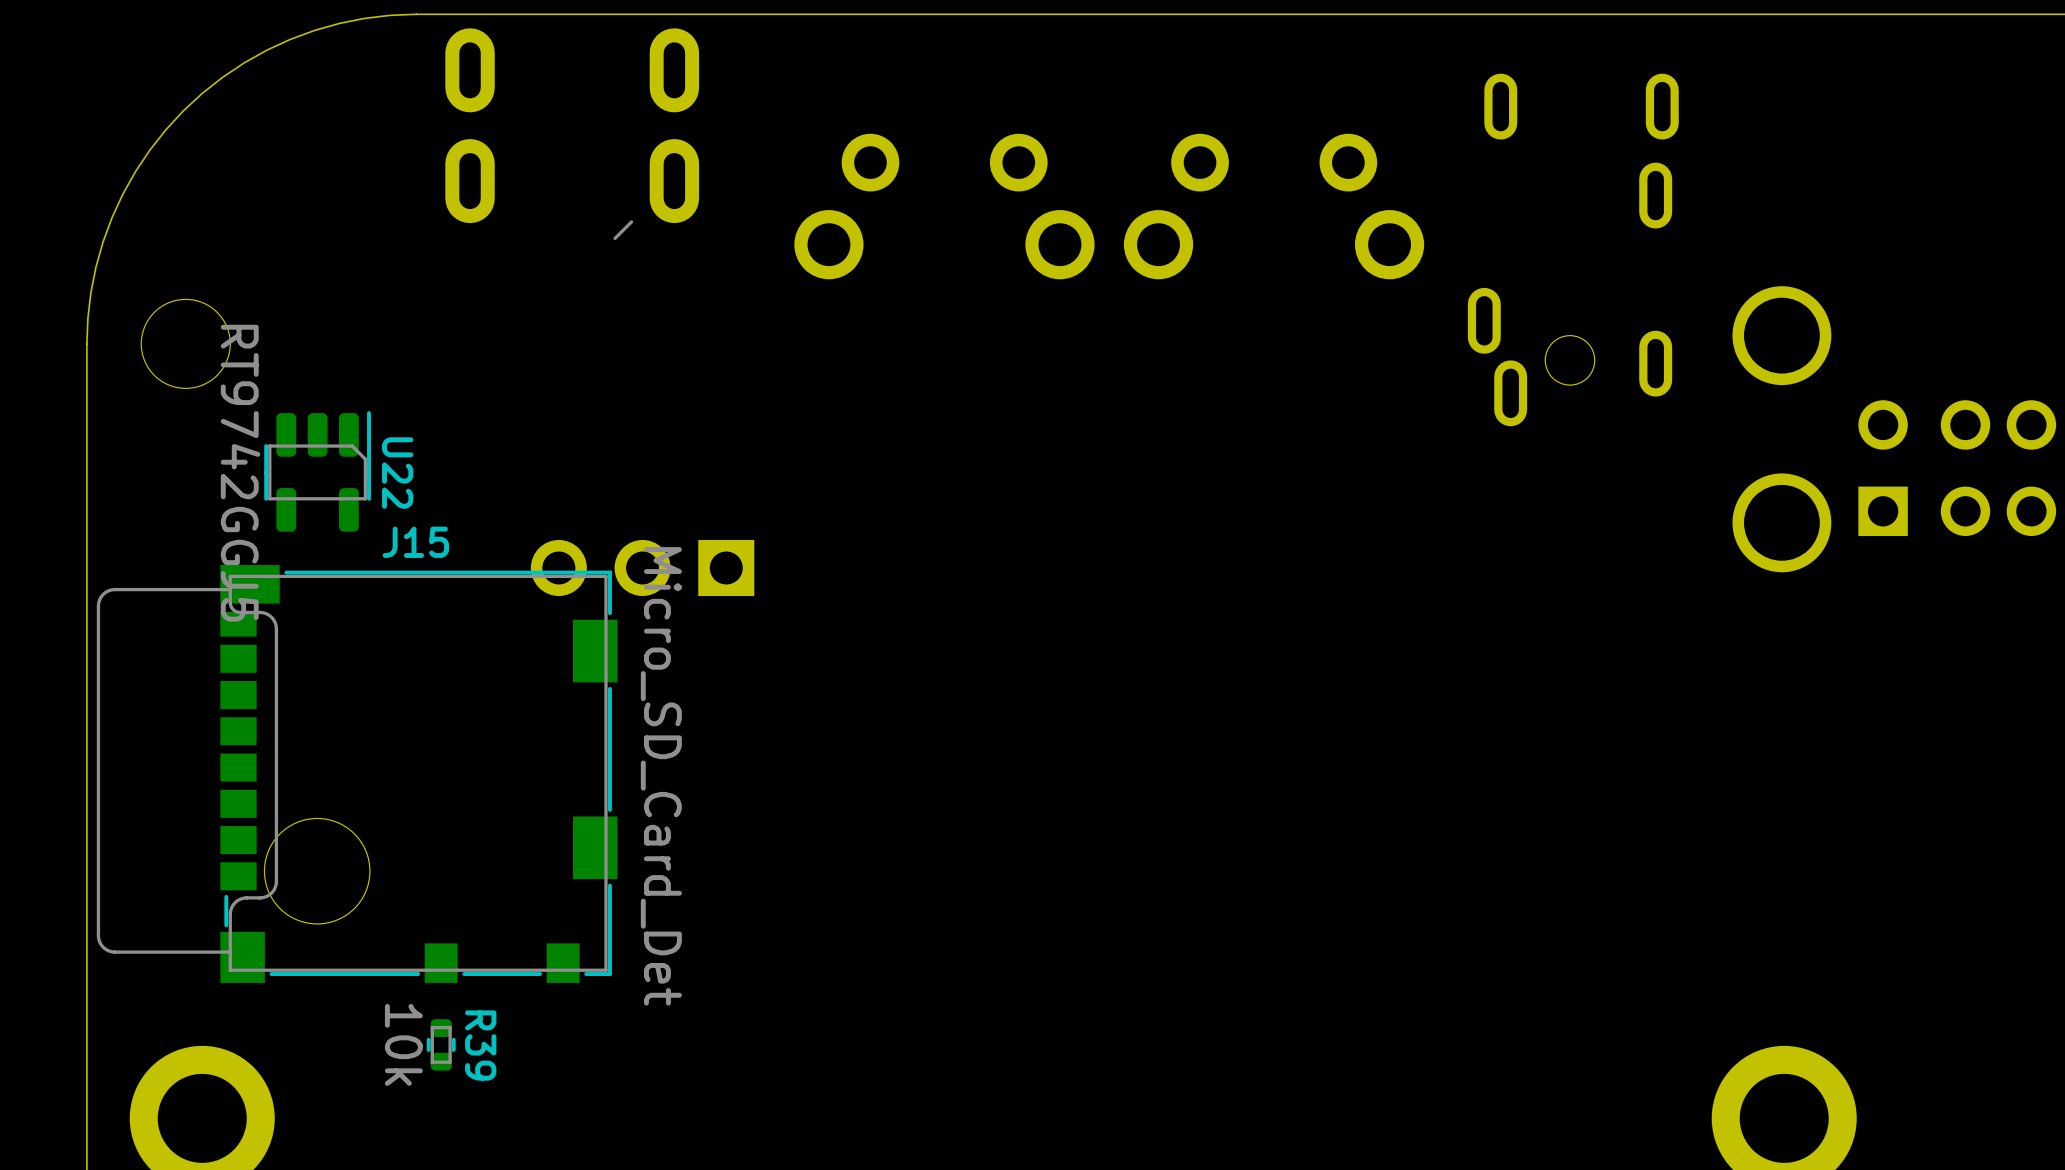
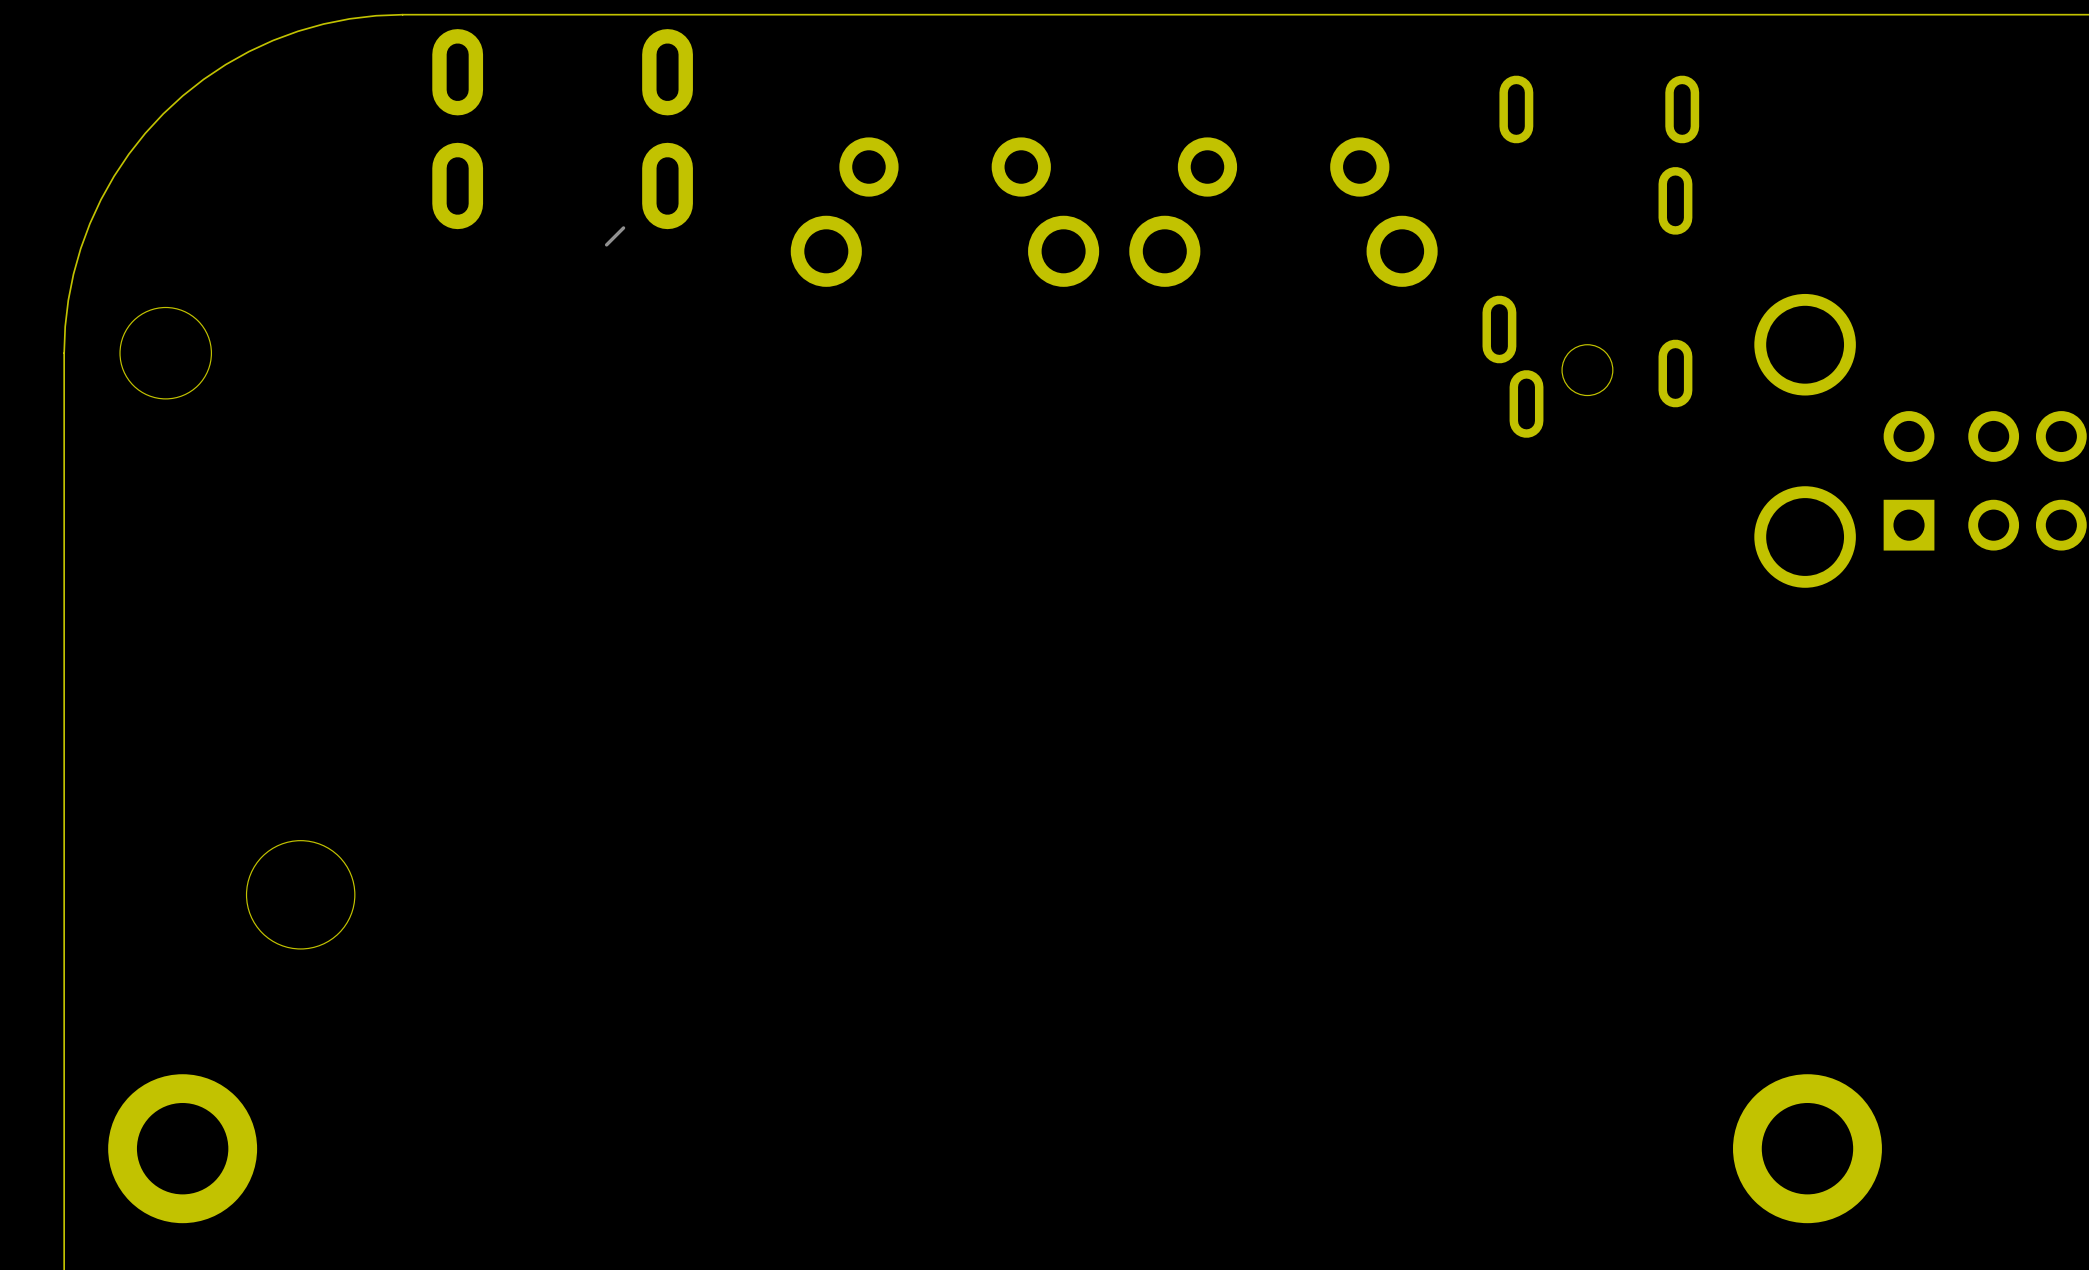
U22: RT9742GGJ5 (317, 471) -> none
part: (642, 567) -> none
J15: Micro_SD_Card_Det (357, 773) -> none
R39: 10k (441, 1044) -> none

